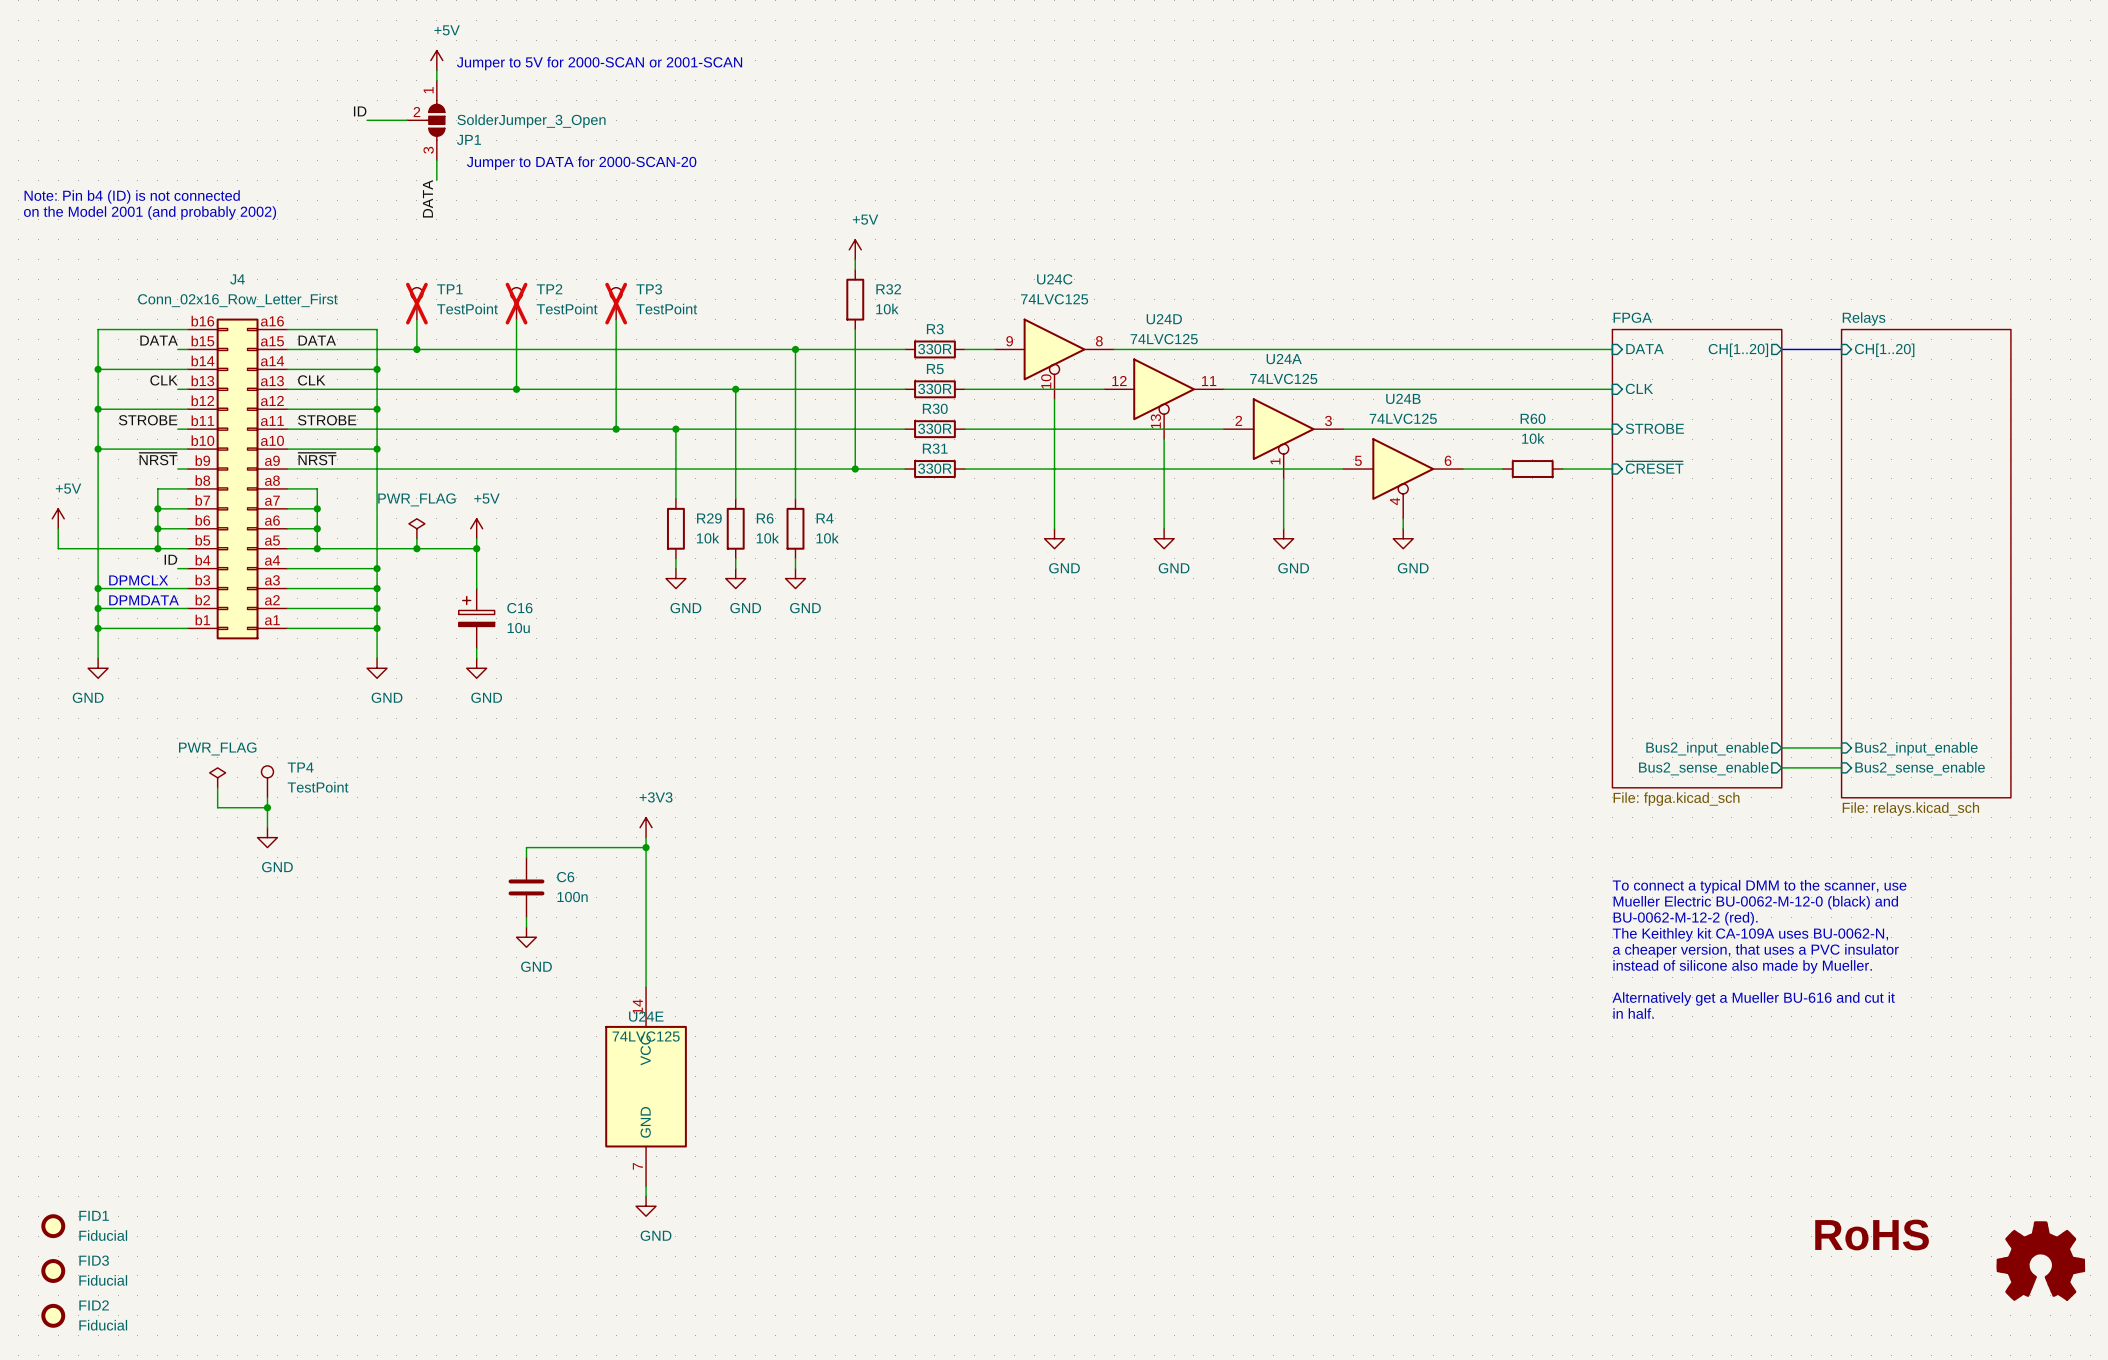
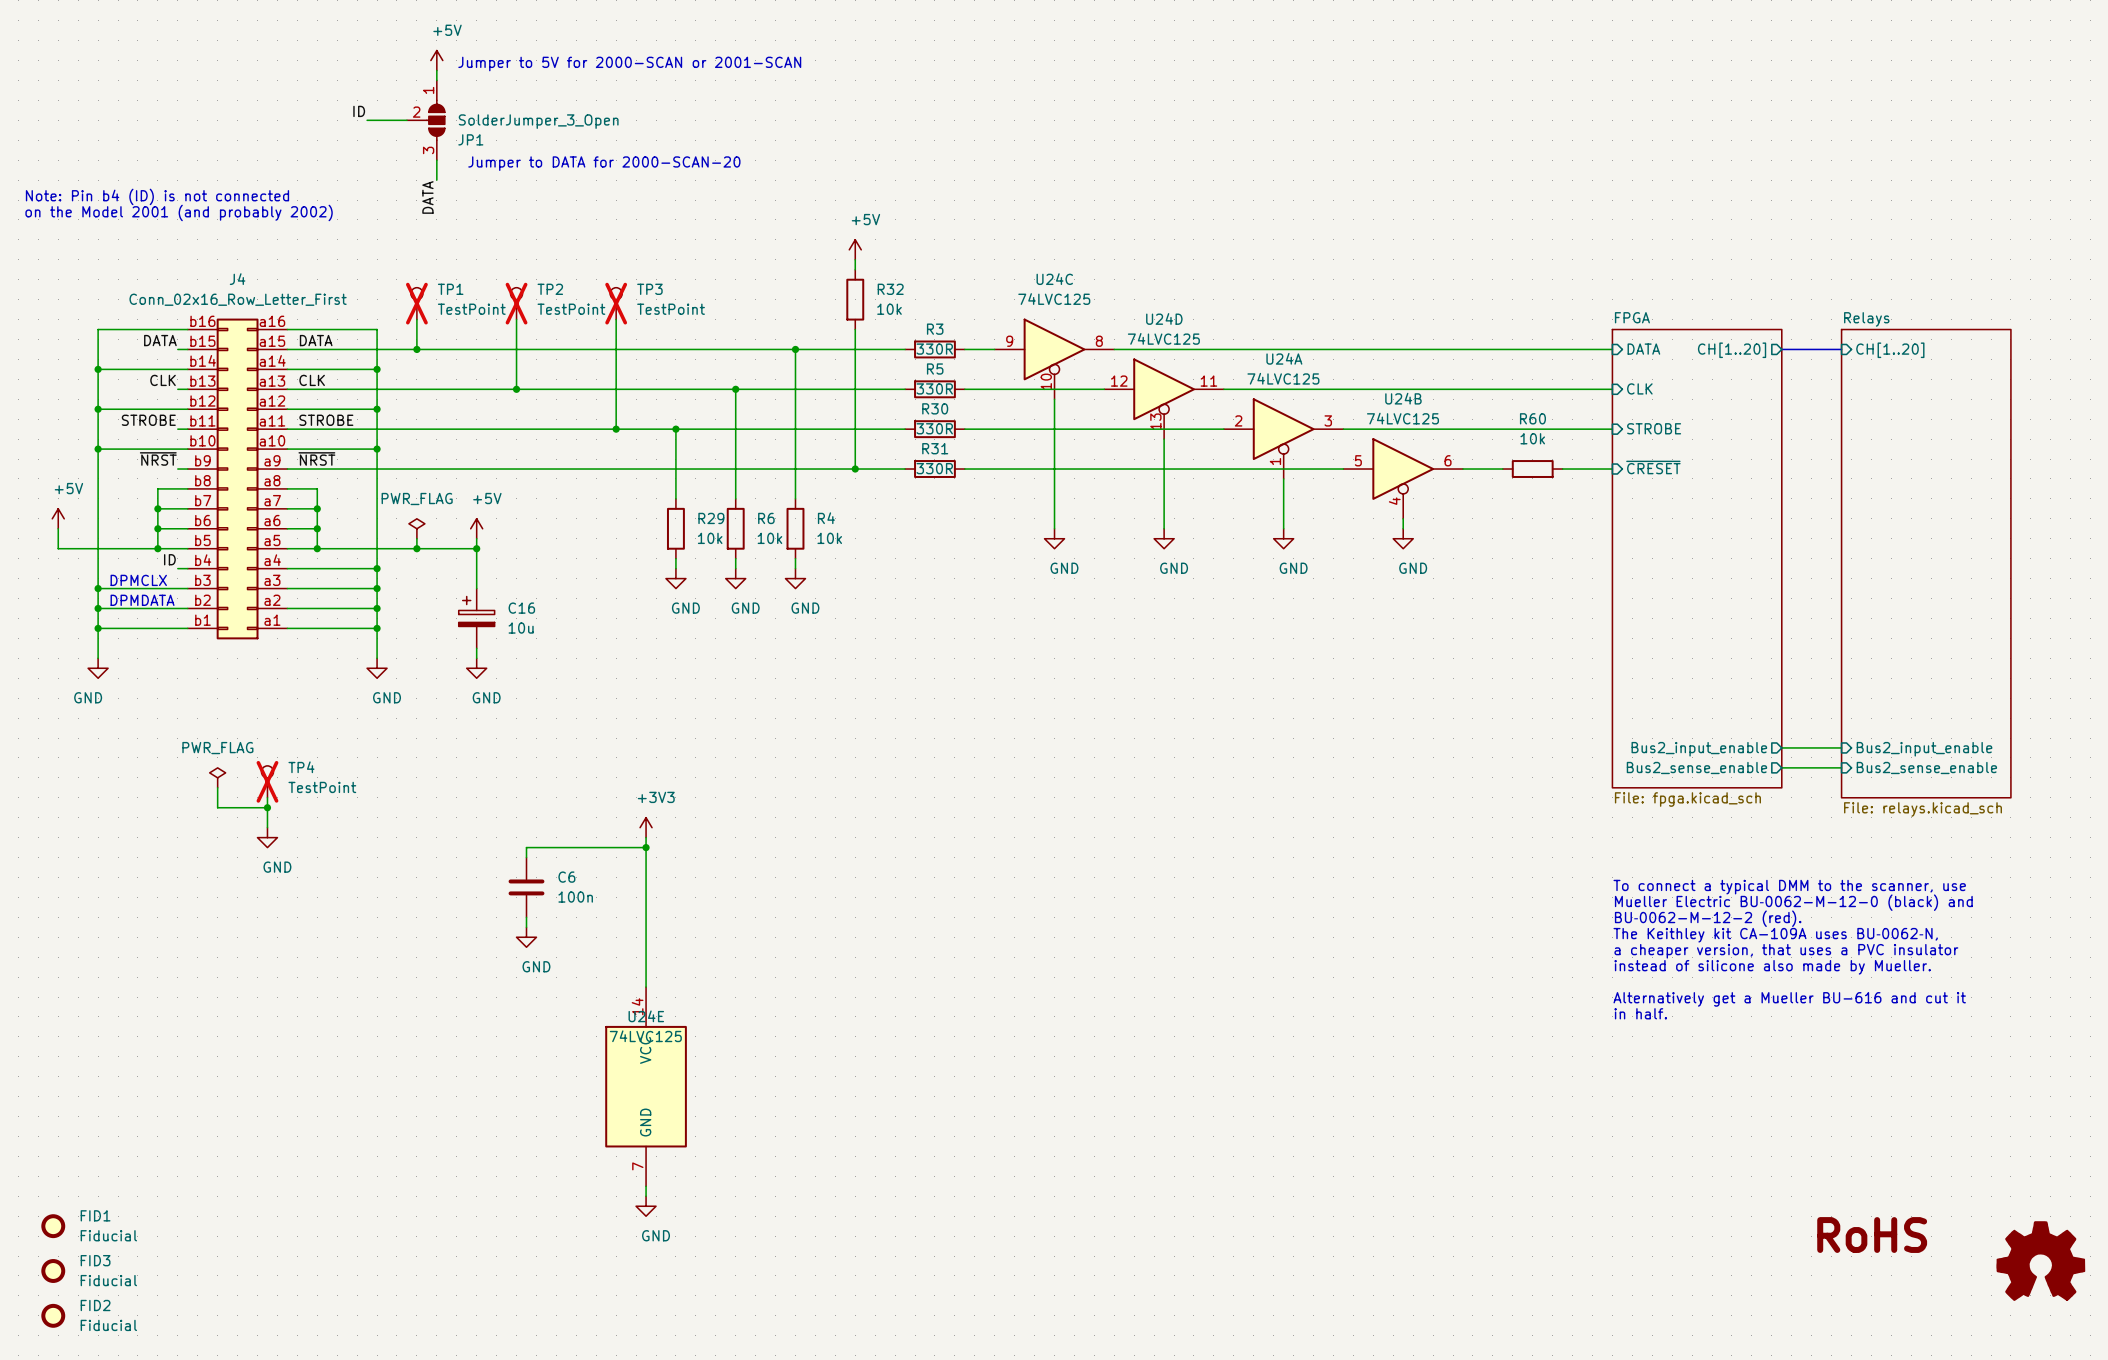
TP4 do-not-place cross: none -> (267, 781)

